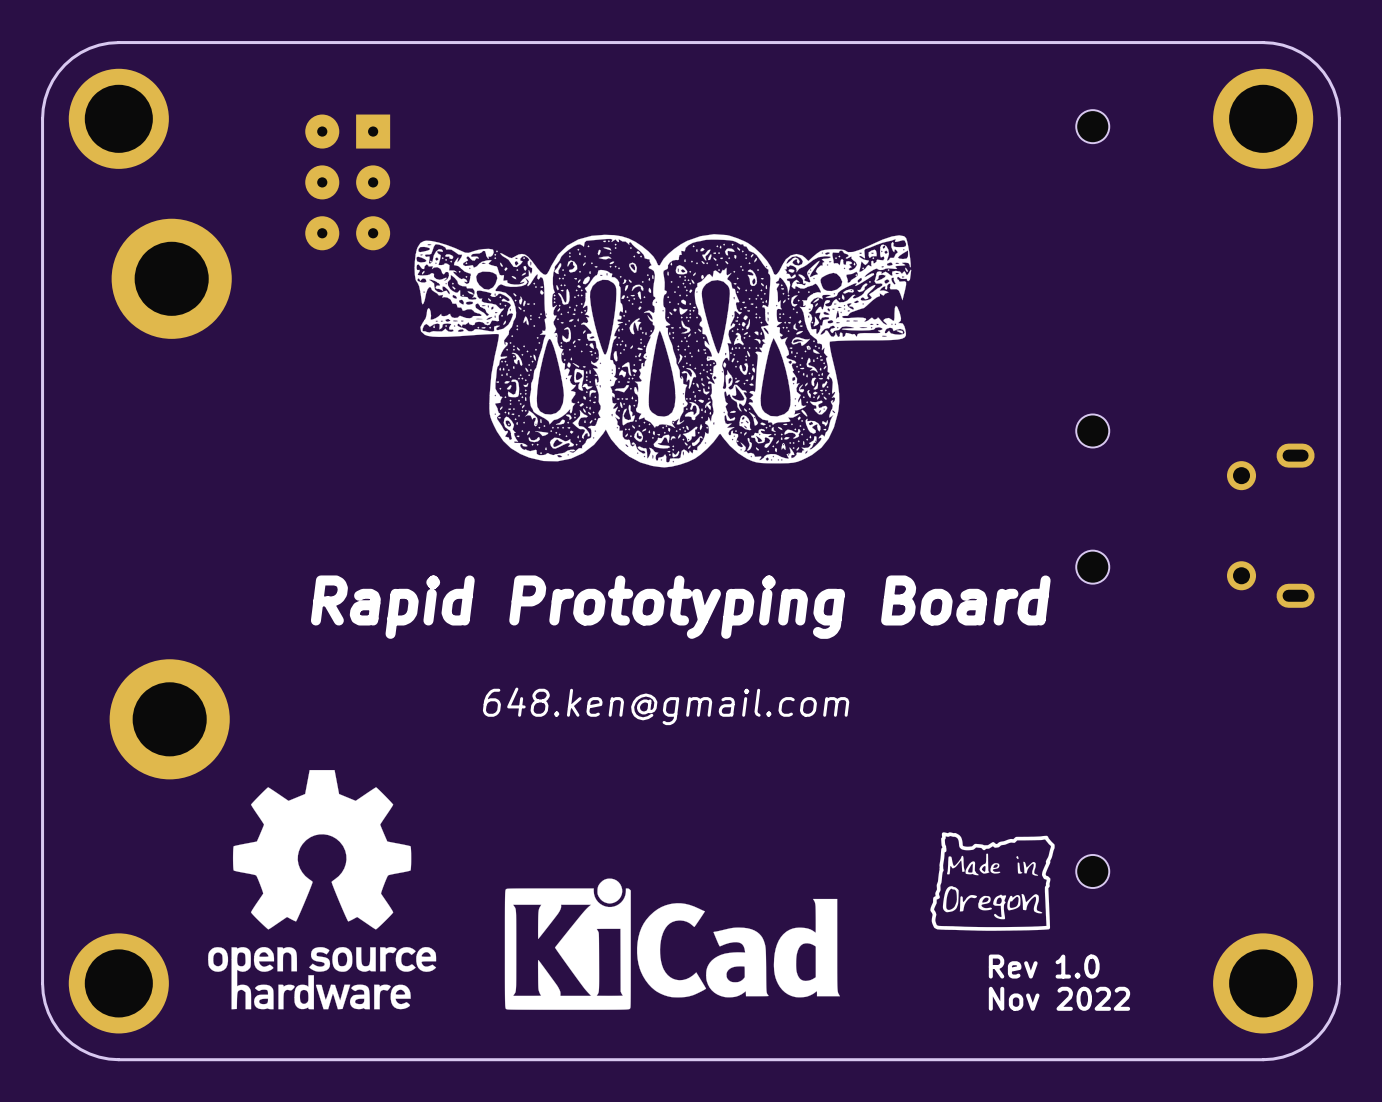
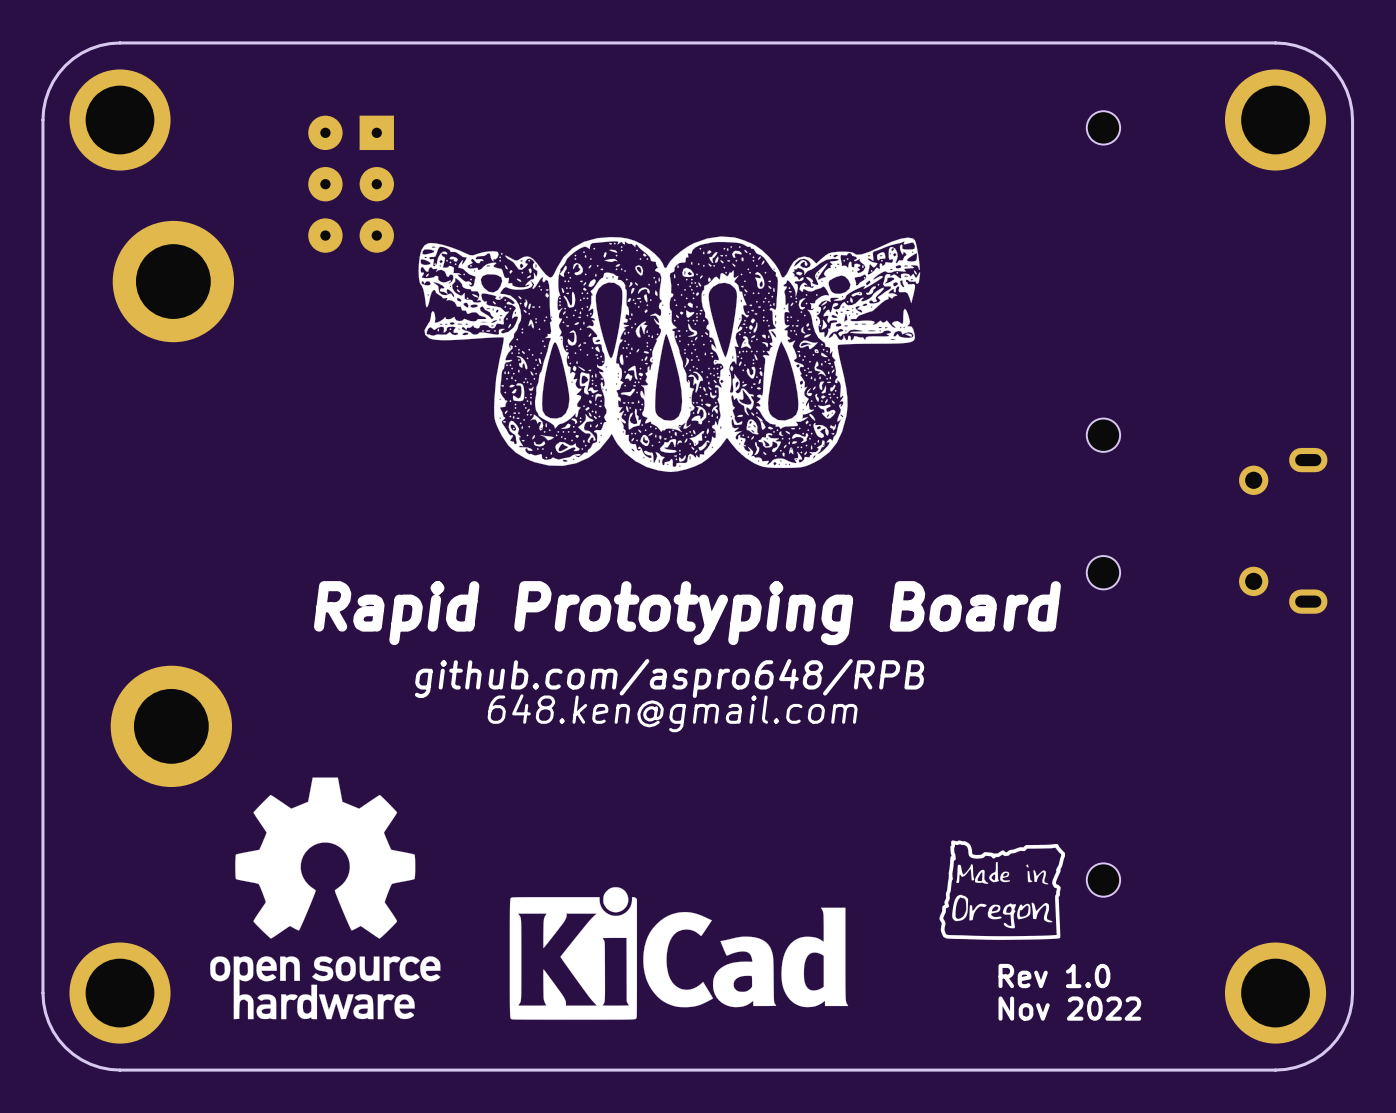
text: none -> github.com/aspro648/RPB (669, 678)

